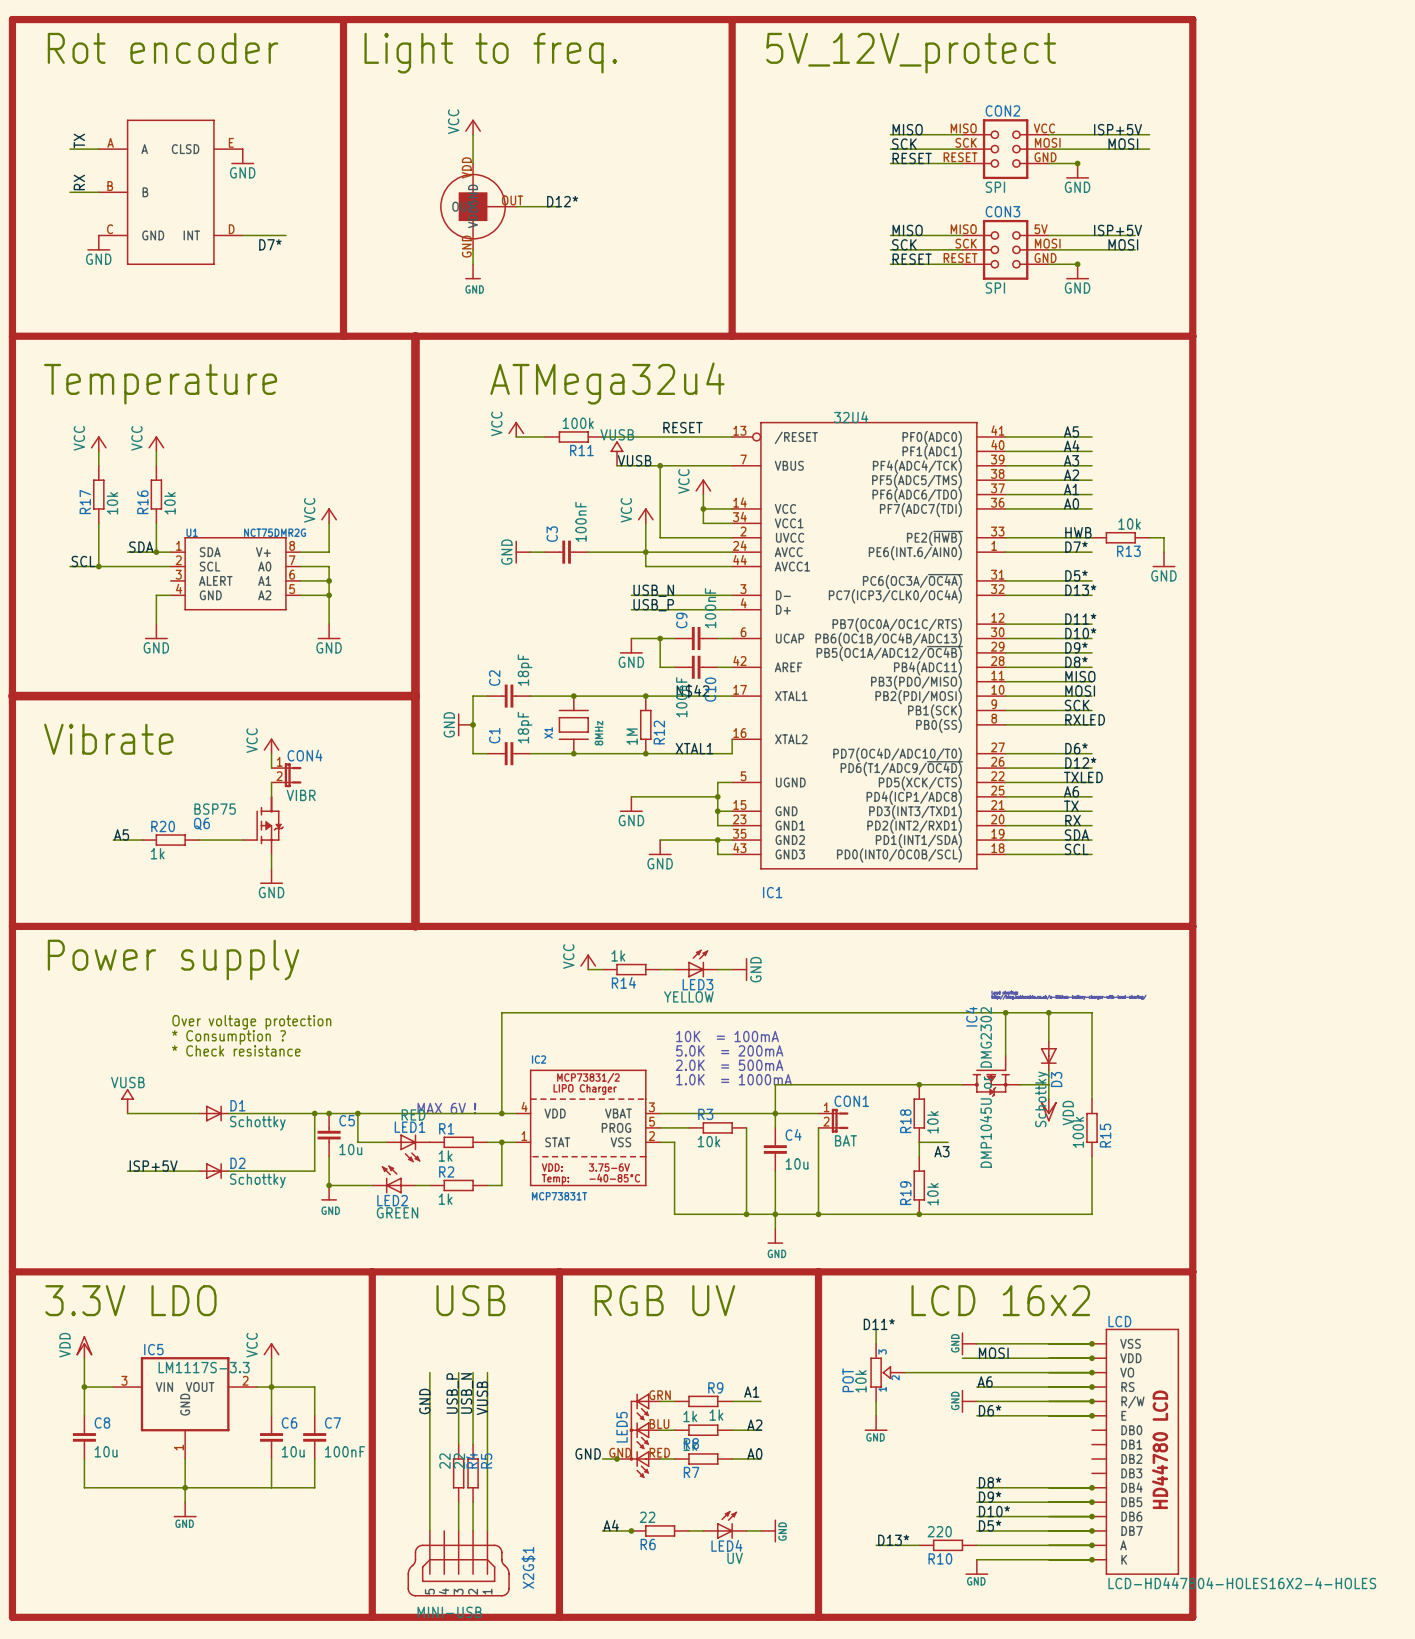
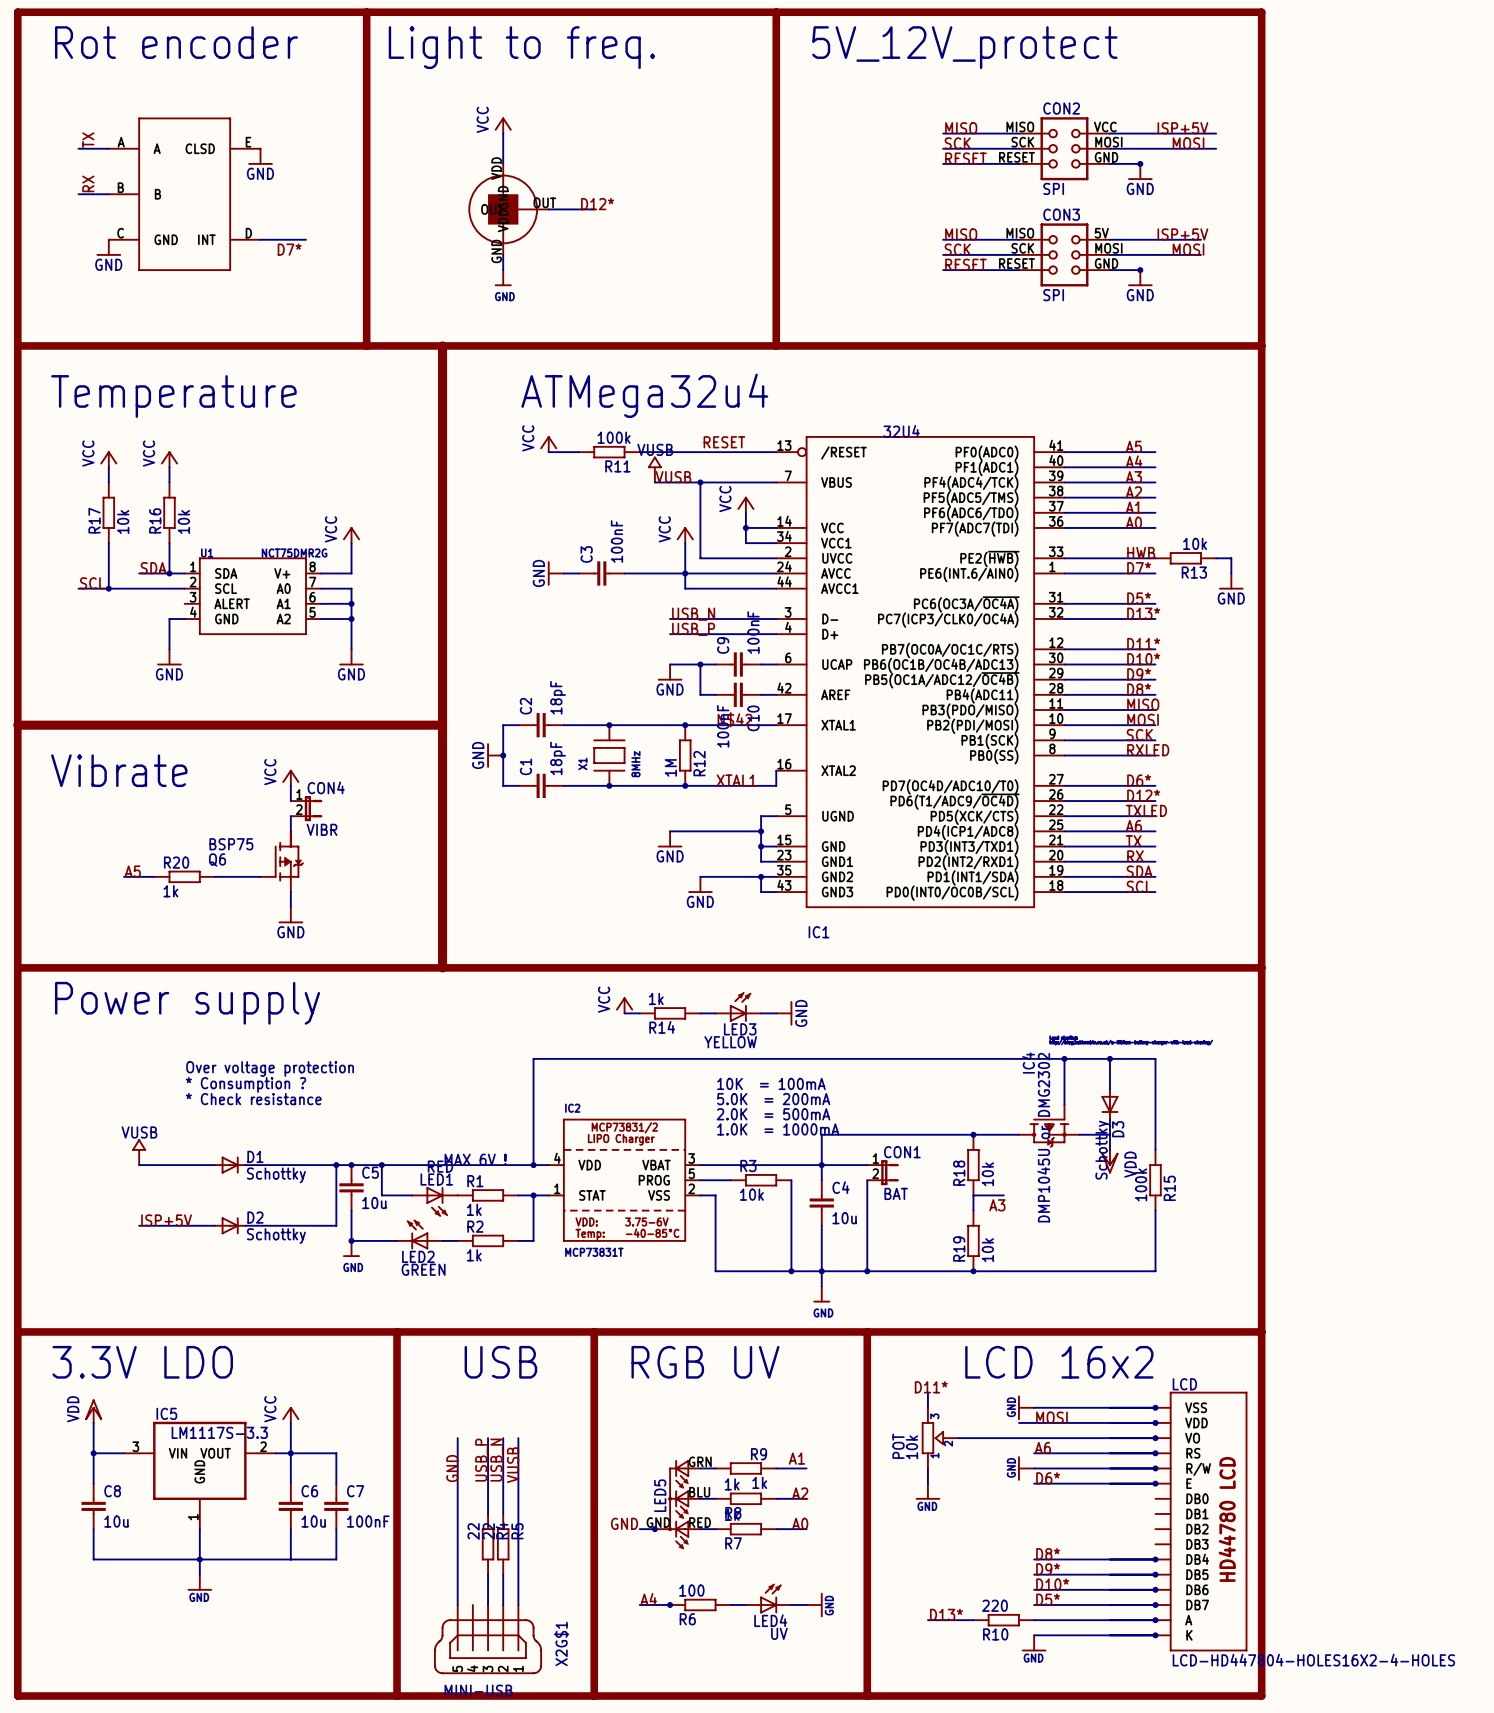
R6 value: 22 (647, 1517) -> 100 (691, 1590)

